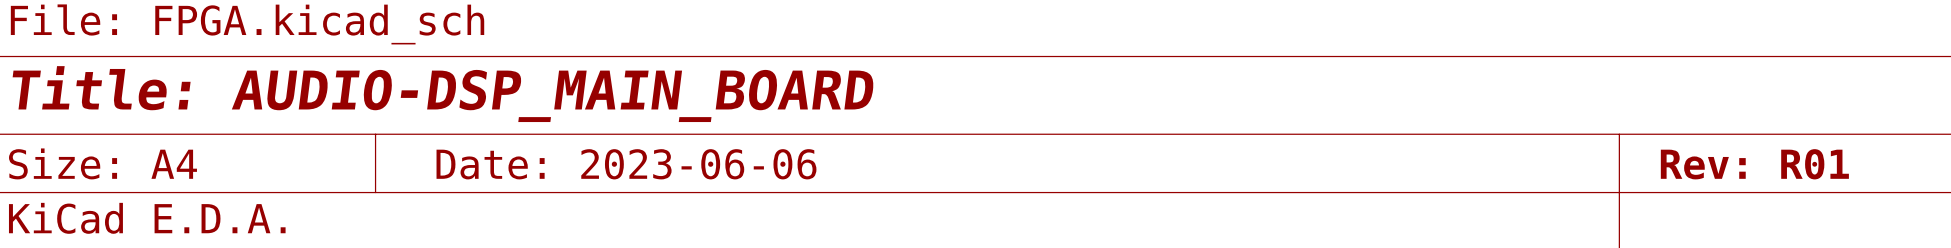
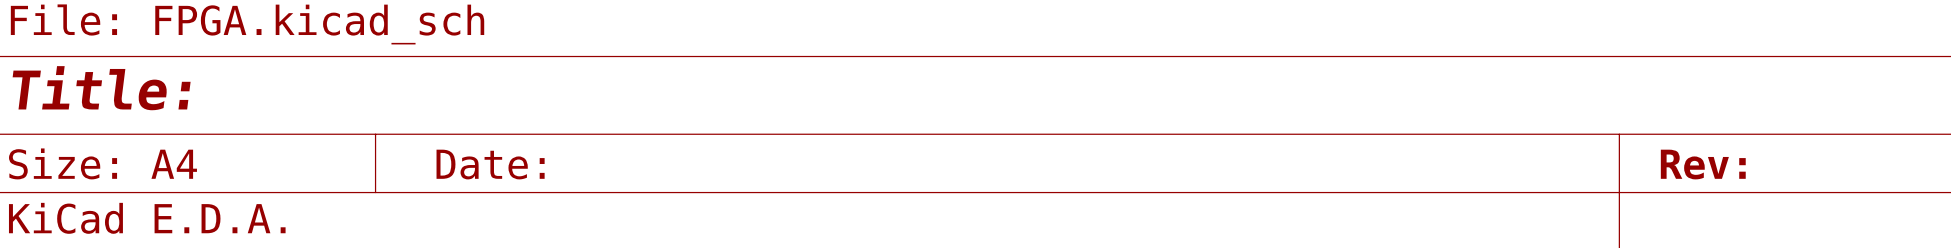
title block: Title: AUDIO-DSP_MAIN_BOARD (443, 94) -> Title: (101, 88)
title block: Date: 2023-06-06 (626, 164) -> Date: (490, 164)
title block: Rev: R01 (1754, 164) -> Rev: (1703, 164)

